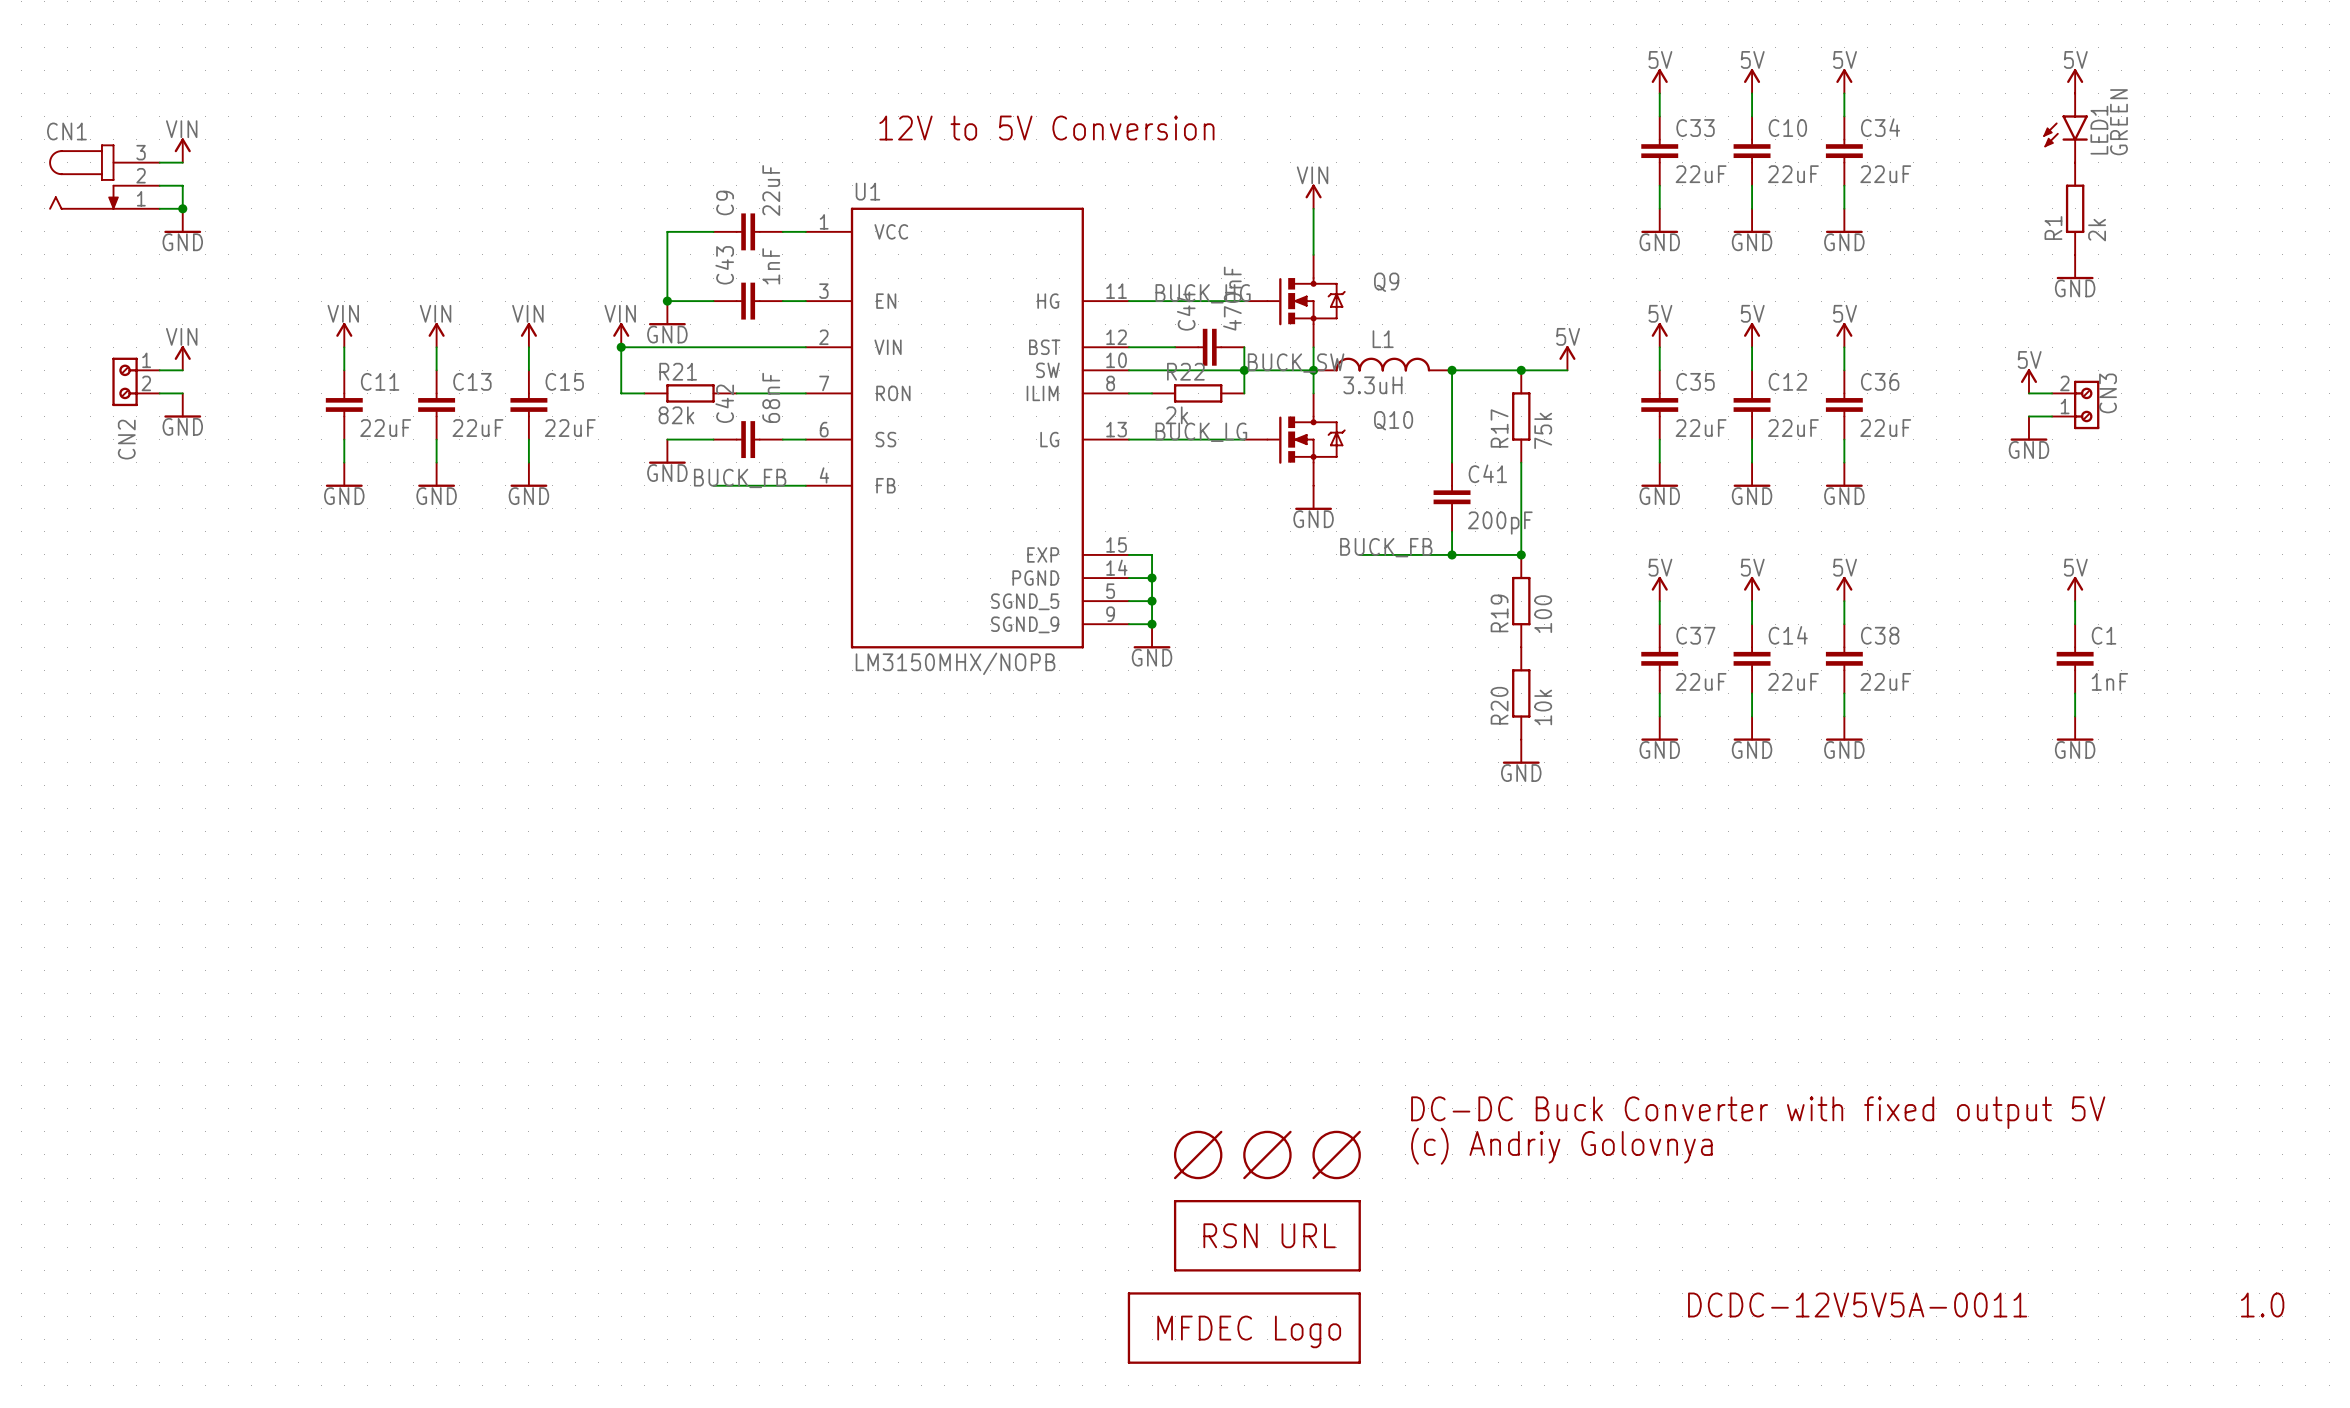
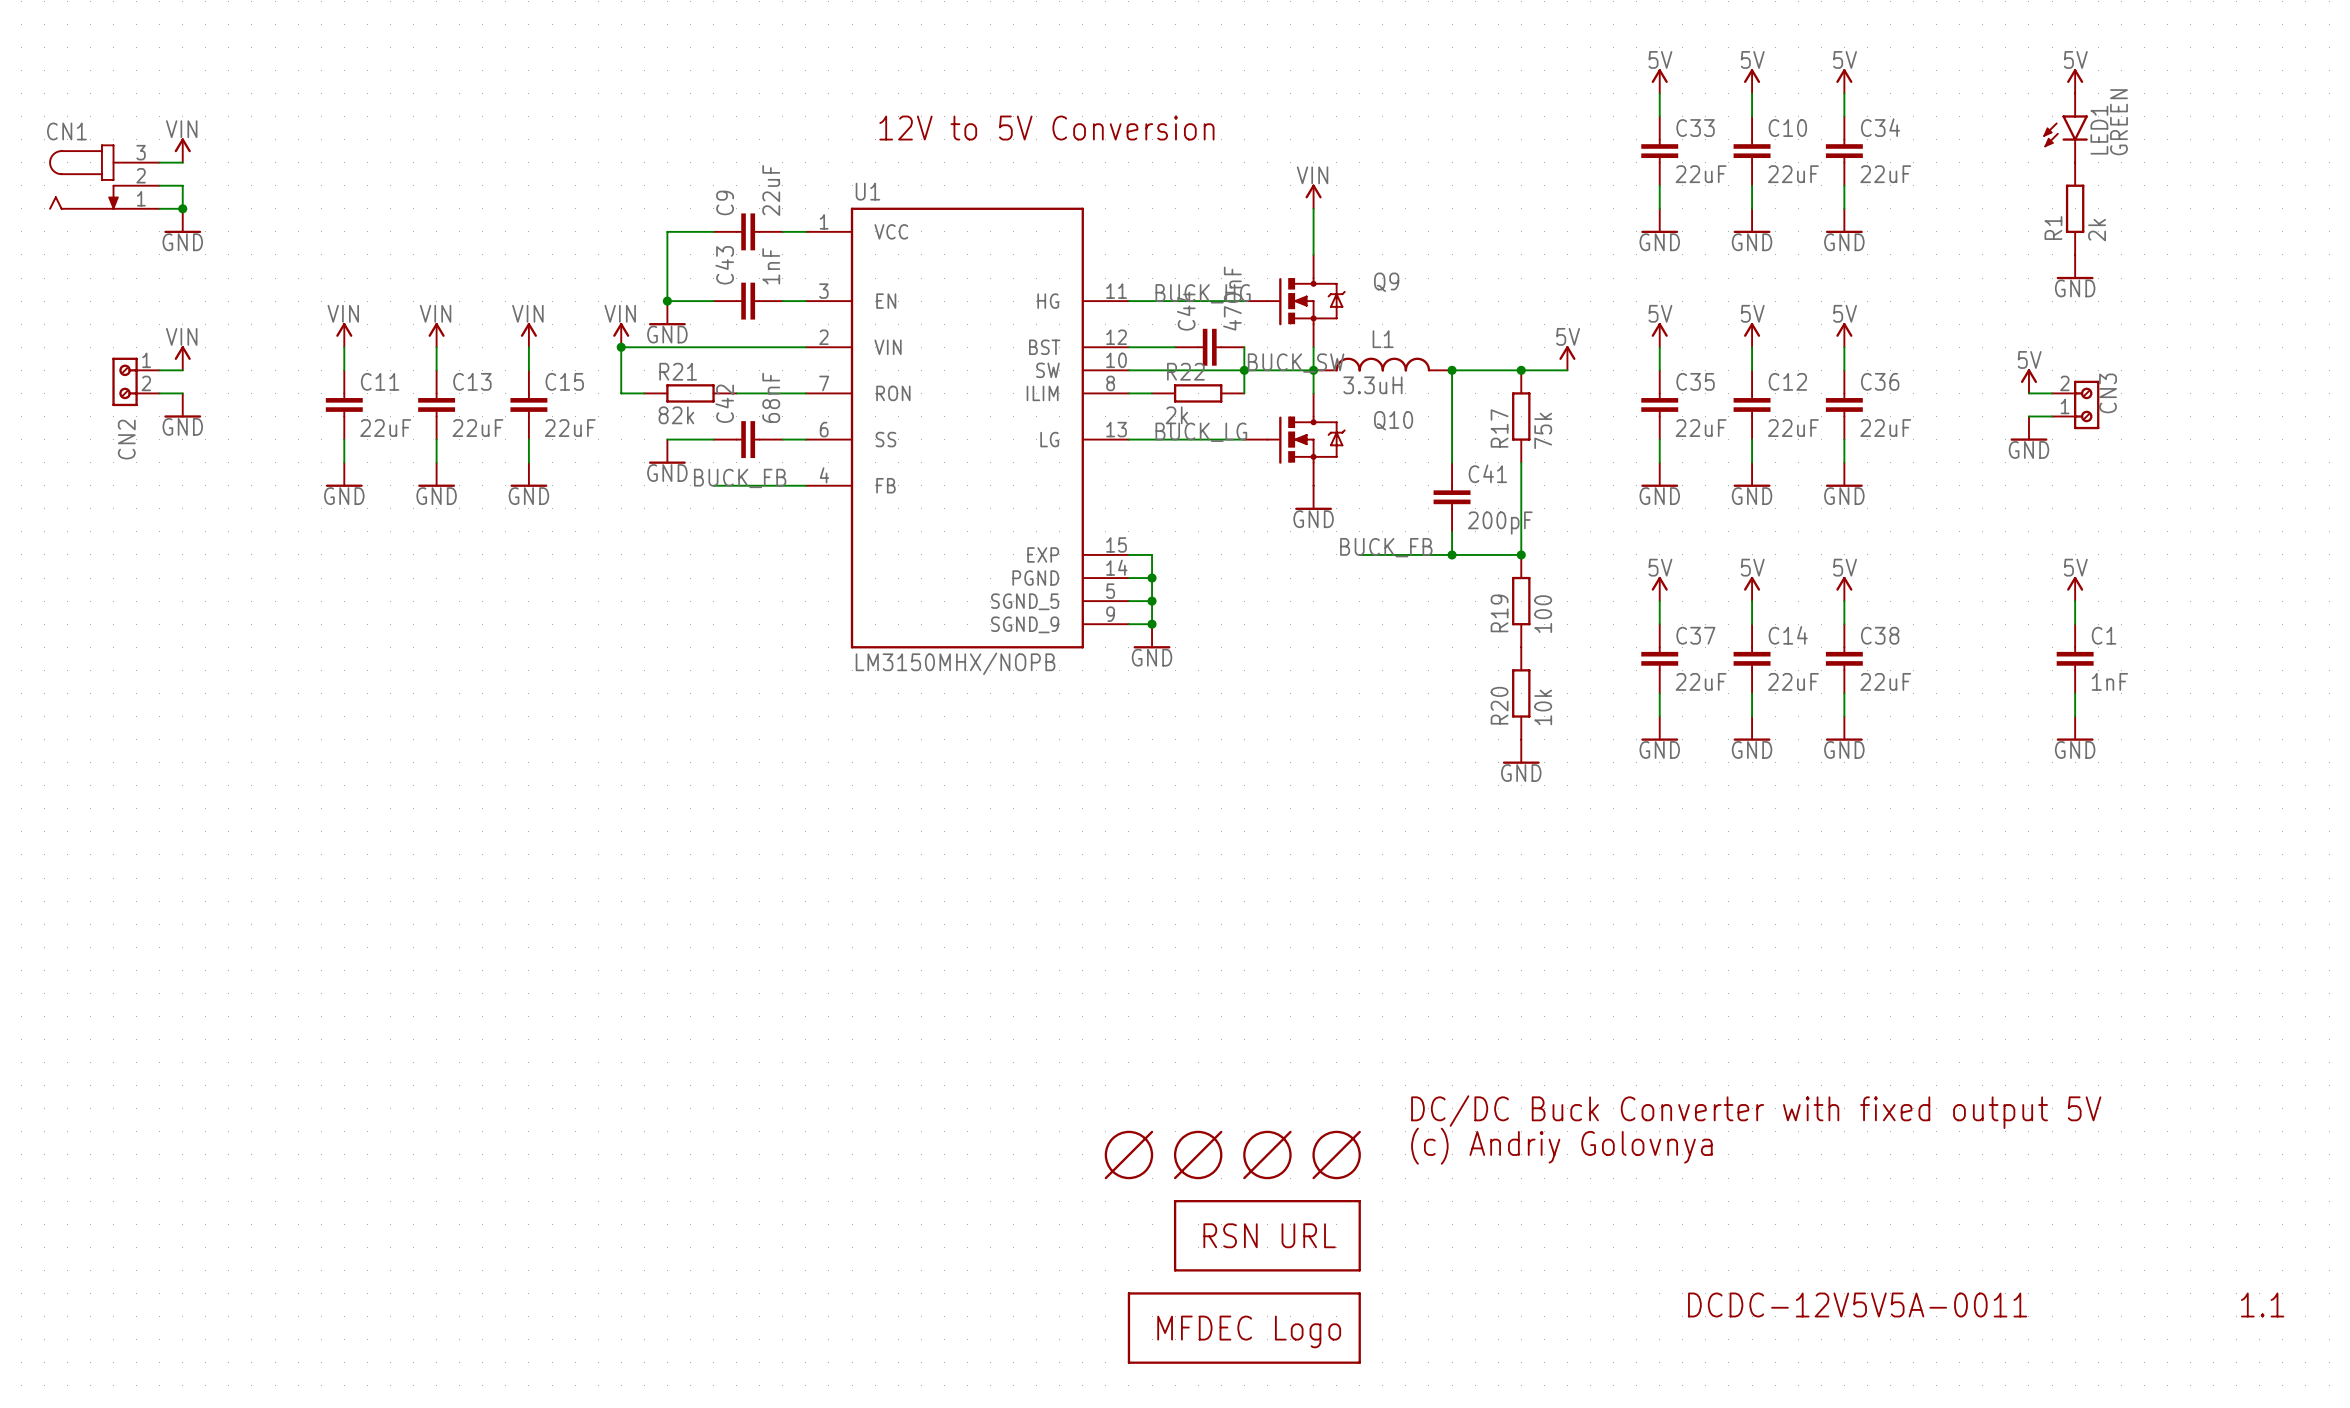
text: DC-DC Buck Converter with fixed output 5V (1758, 1112) -> DC/DC Buck Converter with fixed output 5V (1756, 1112)
part: none -> (1128, 1154)
text: 1.0 (2262, 1304) -> 1.1 (2262, 1304)

